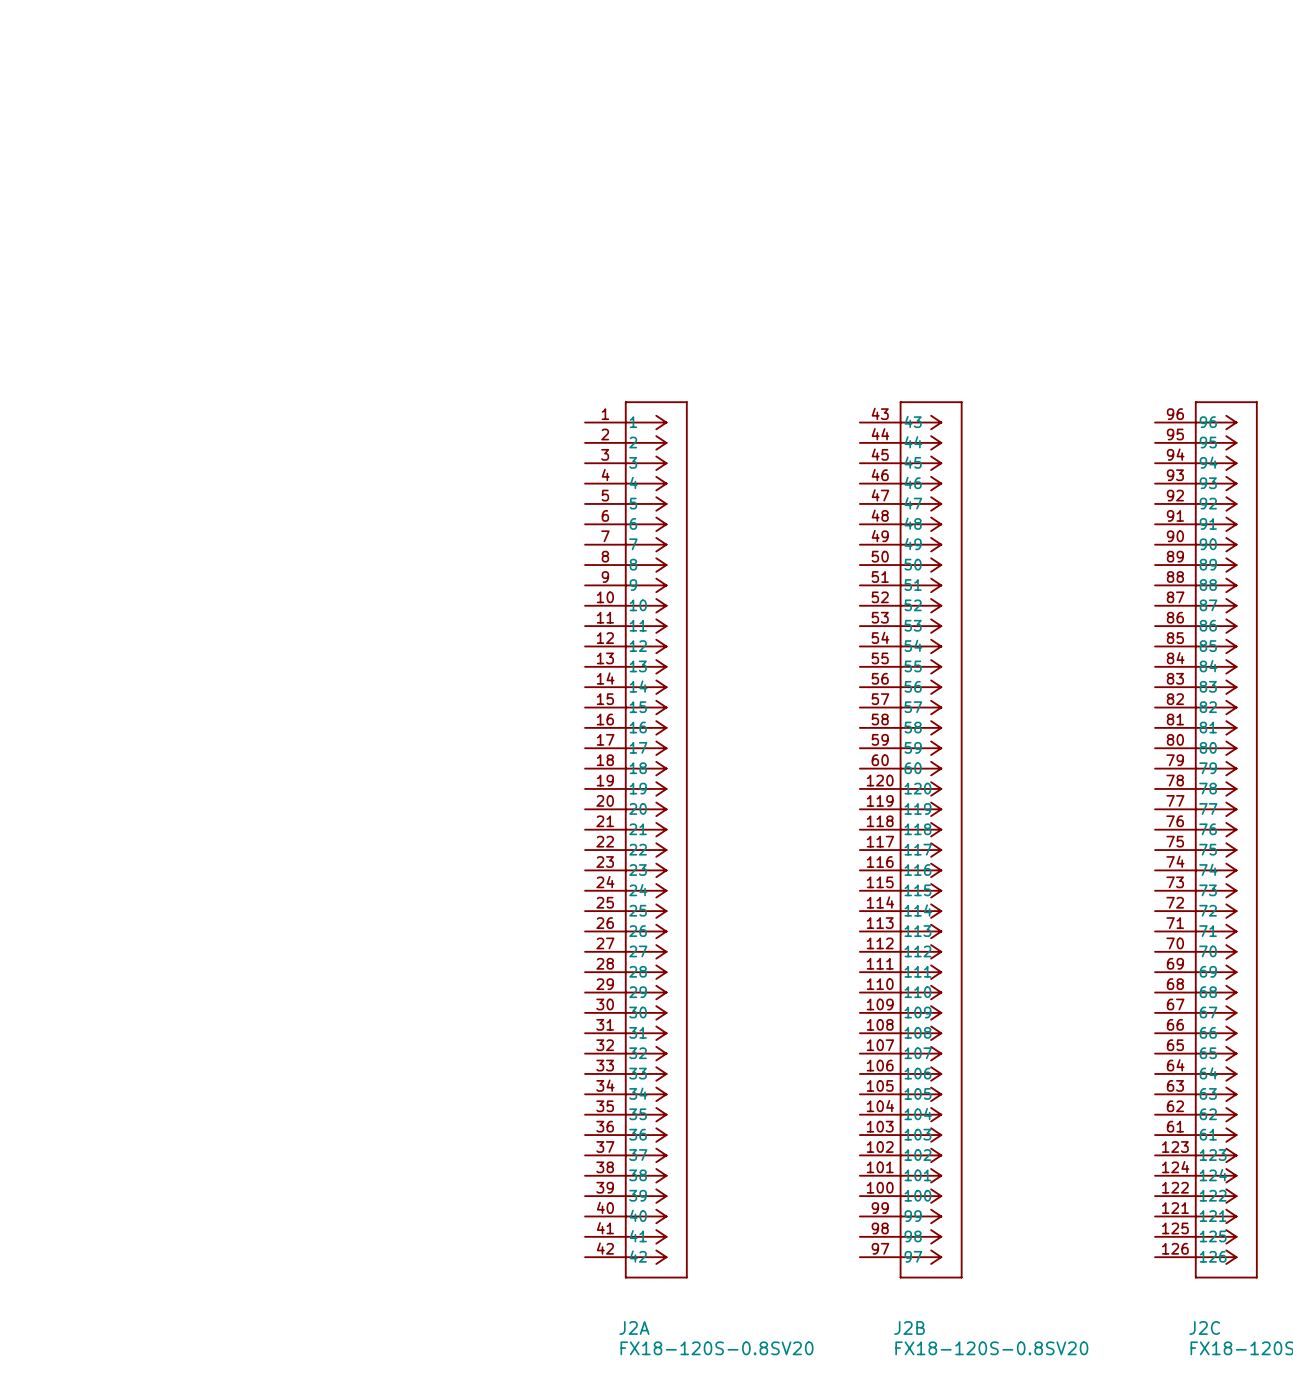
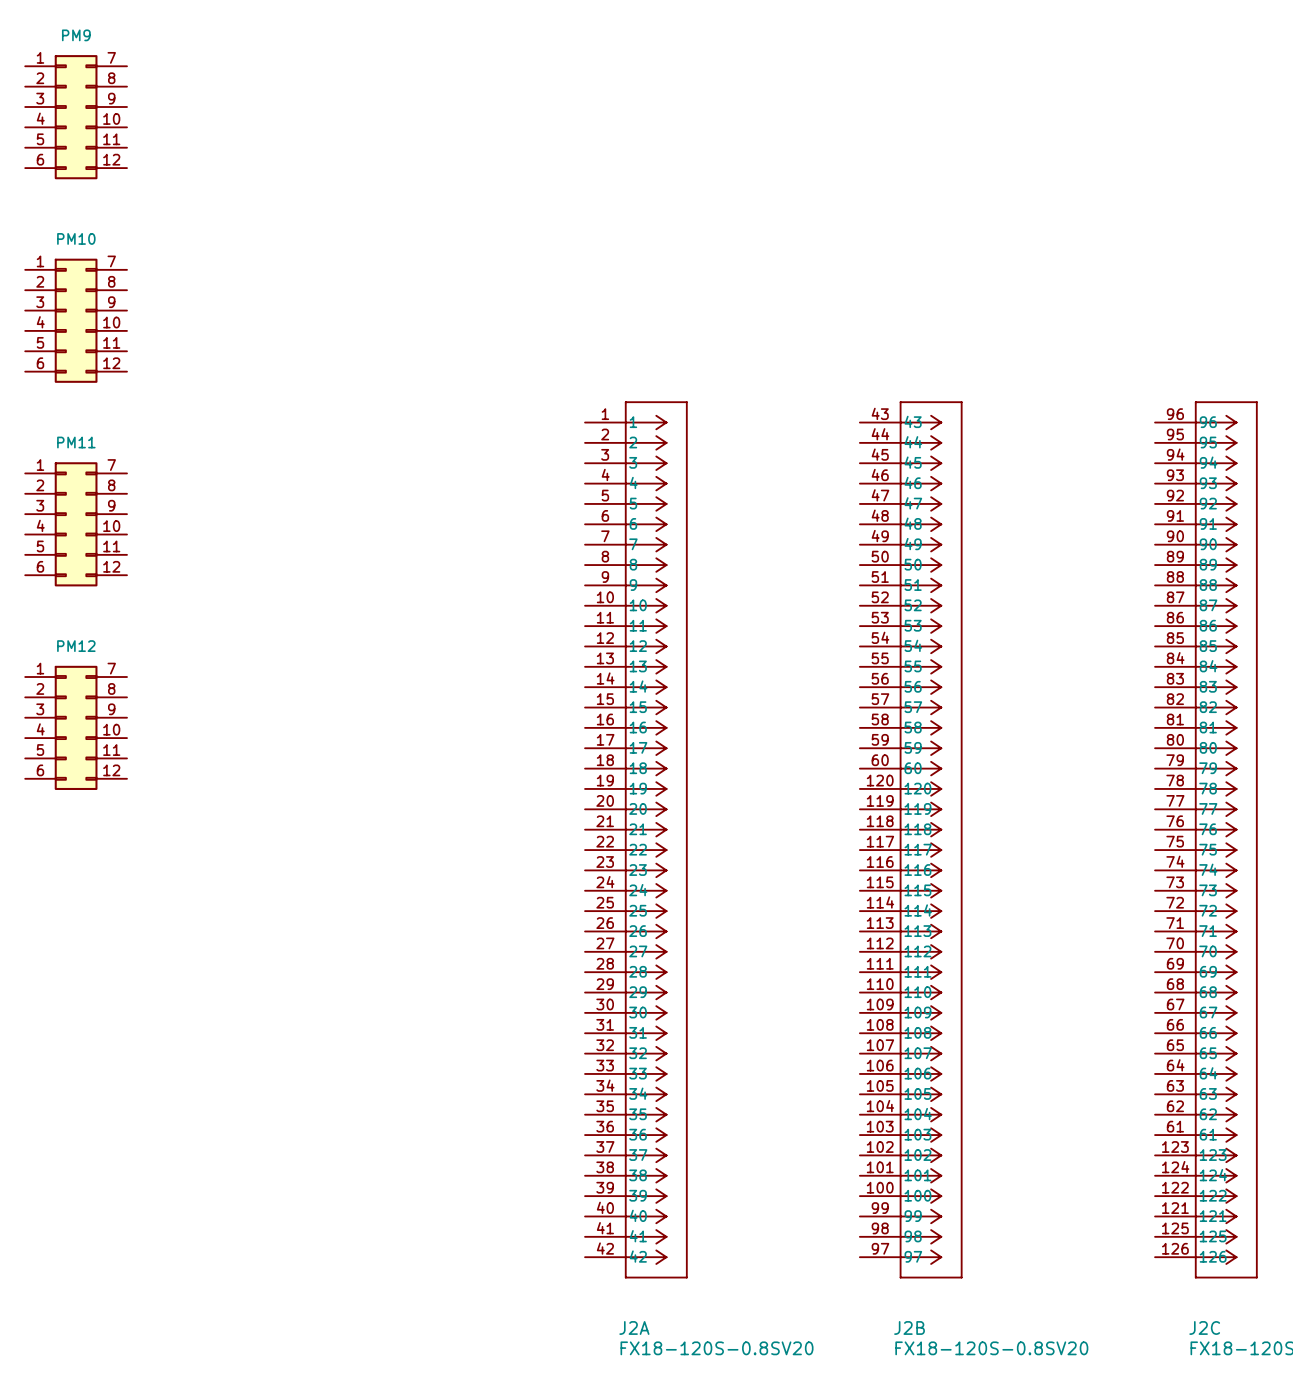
PM9: none -> (76, 117)
PM10: none -> (76, 320)
PM11: none -> (76, 524)
PM12: none -> (76, 727)

